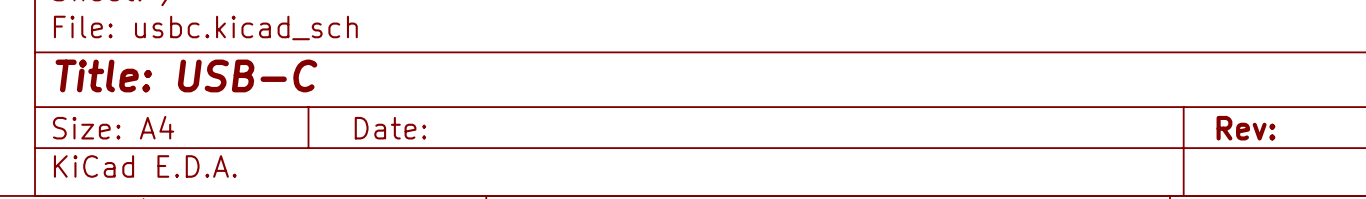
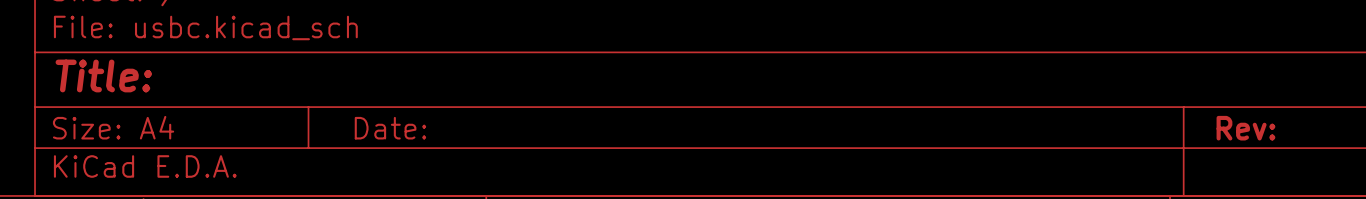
title block: Title: USB-C (186, 75) -> Title: (103, 75)

